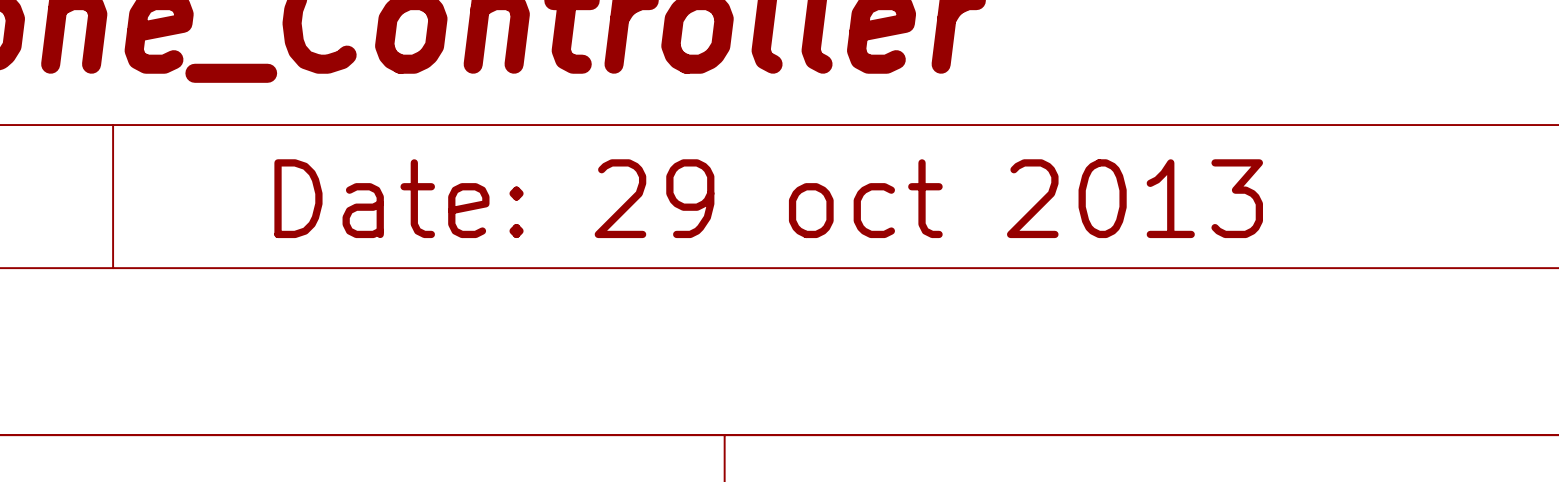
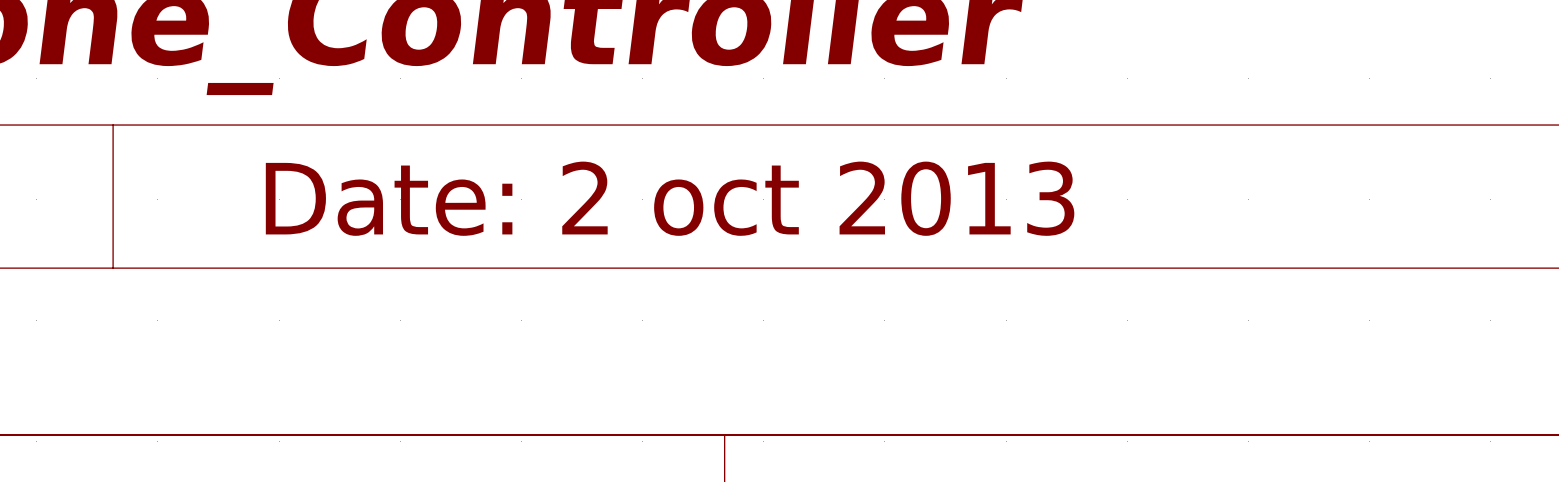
title block: Date: 29 oct 2013 (768, 198) -> Date: 2 oct 2013 (670, 198)

